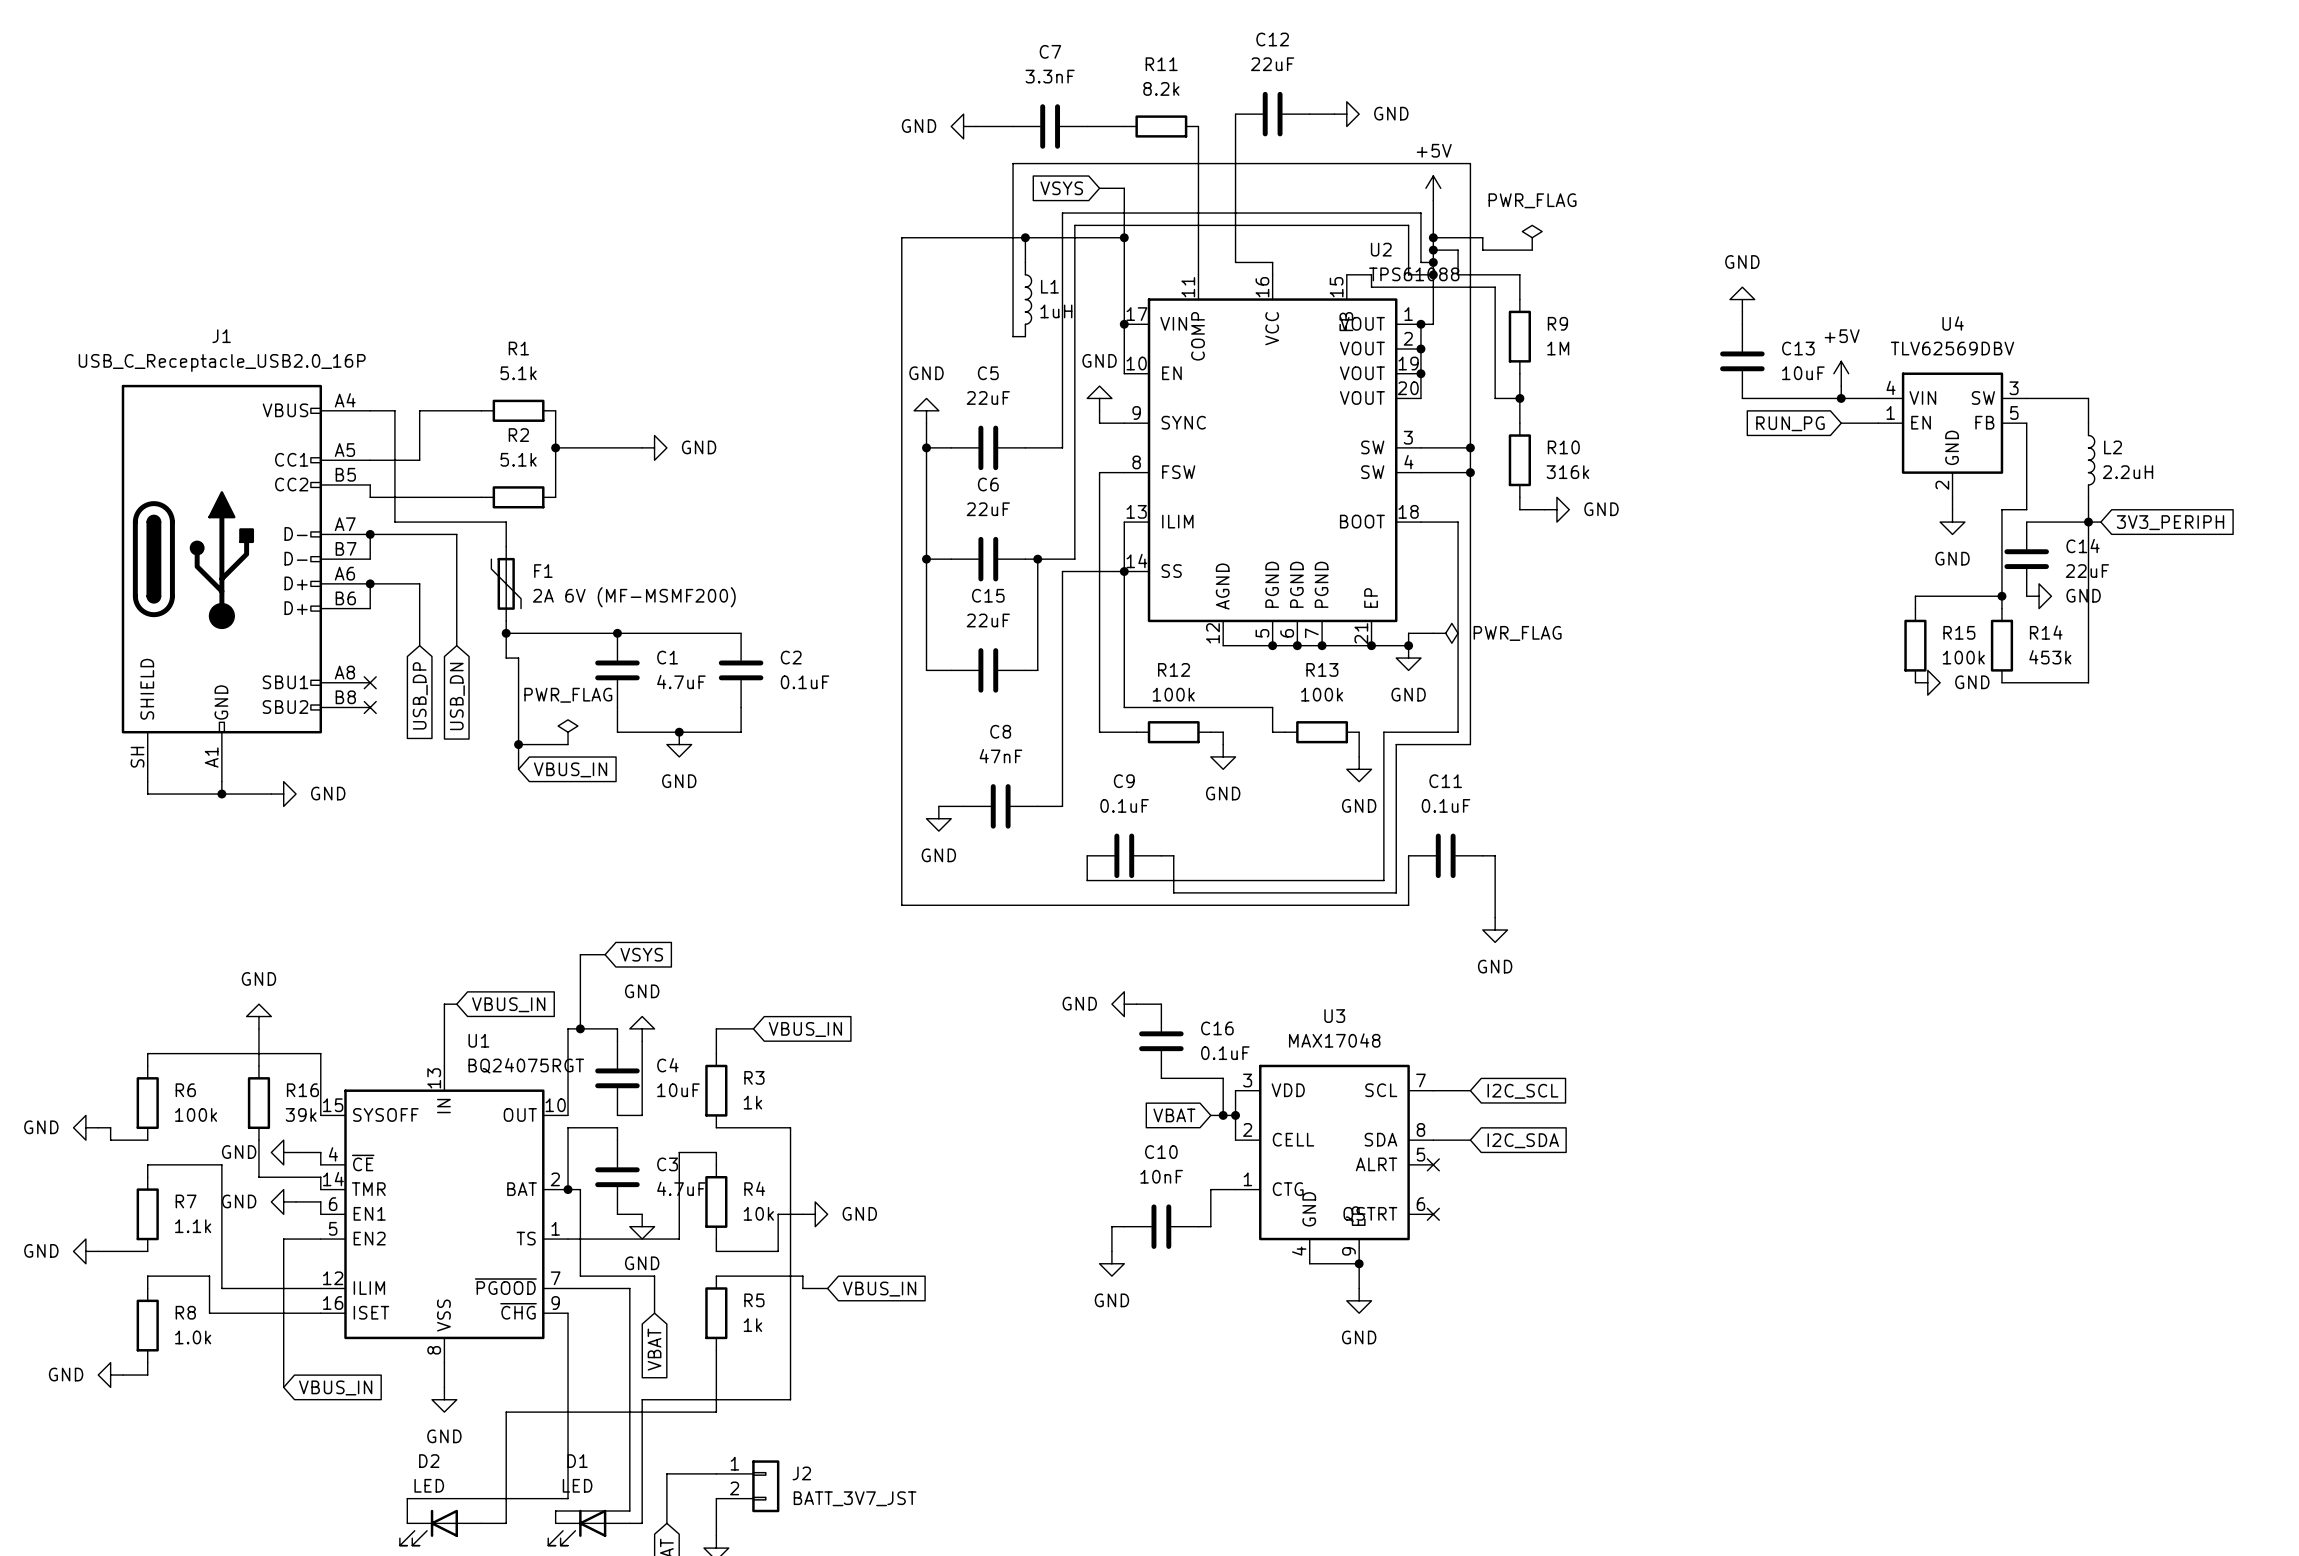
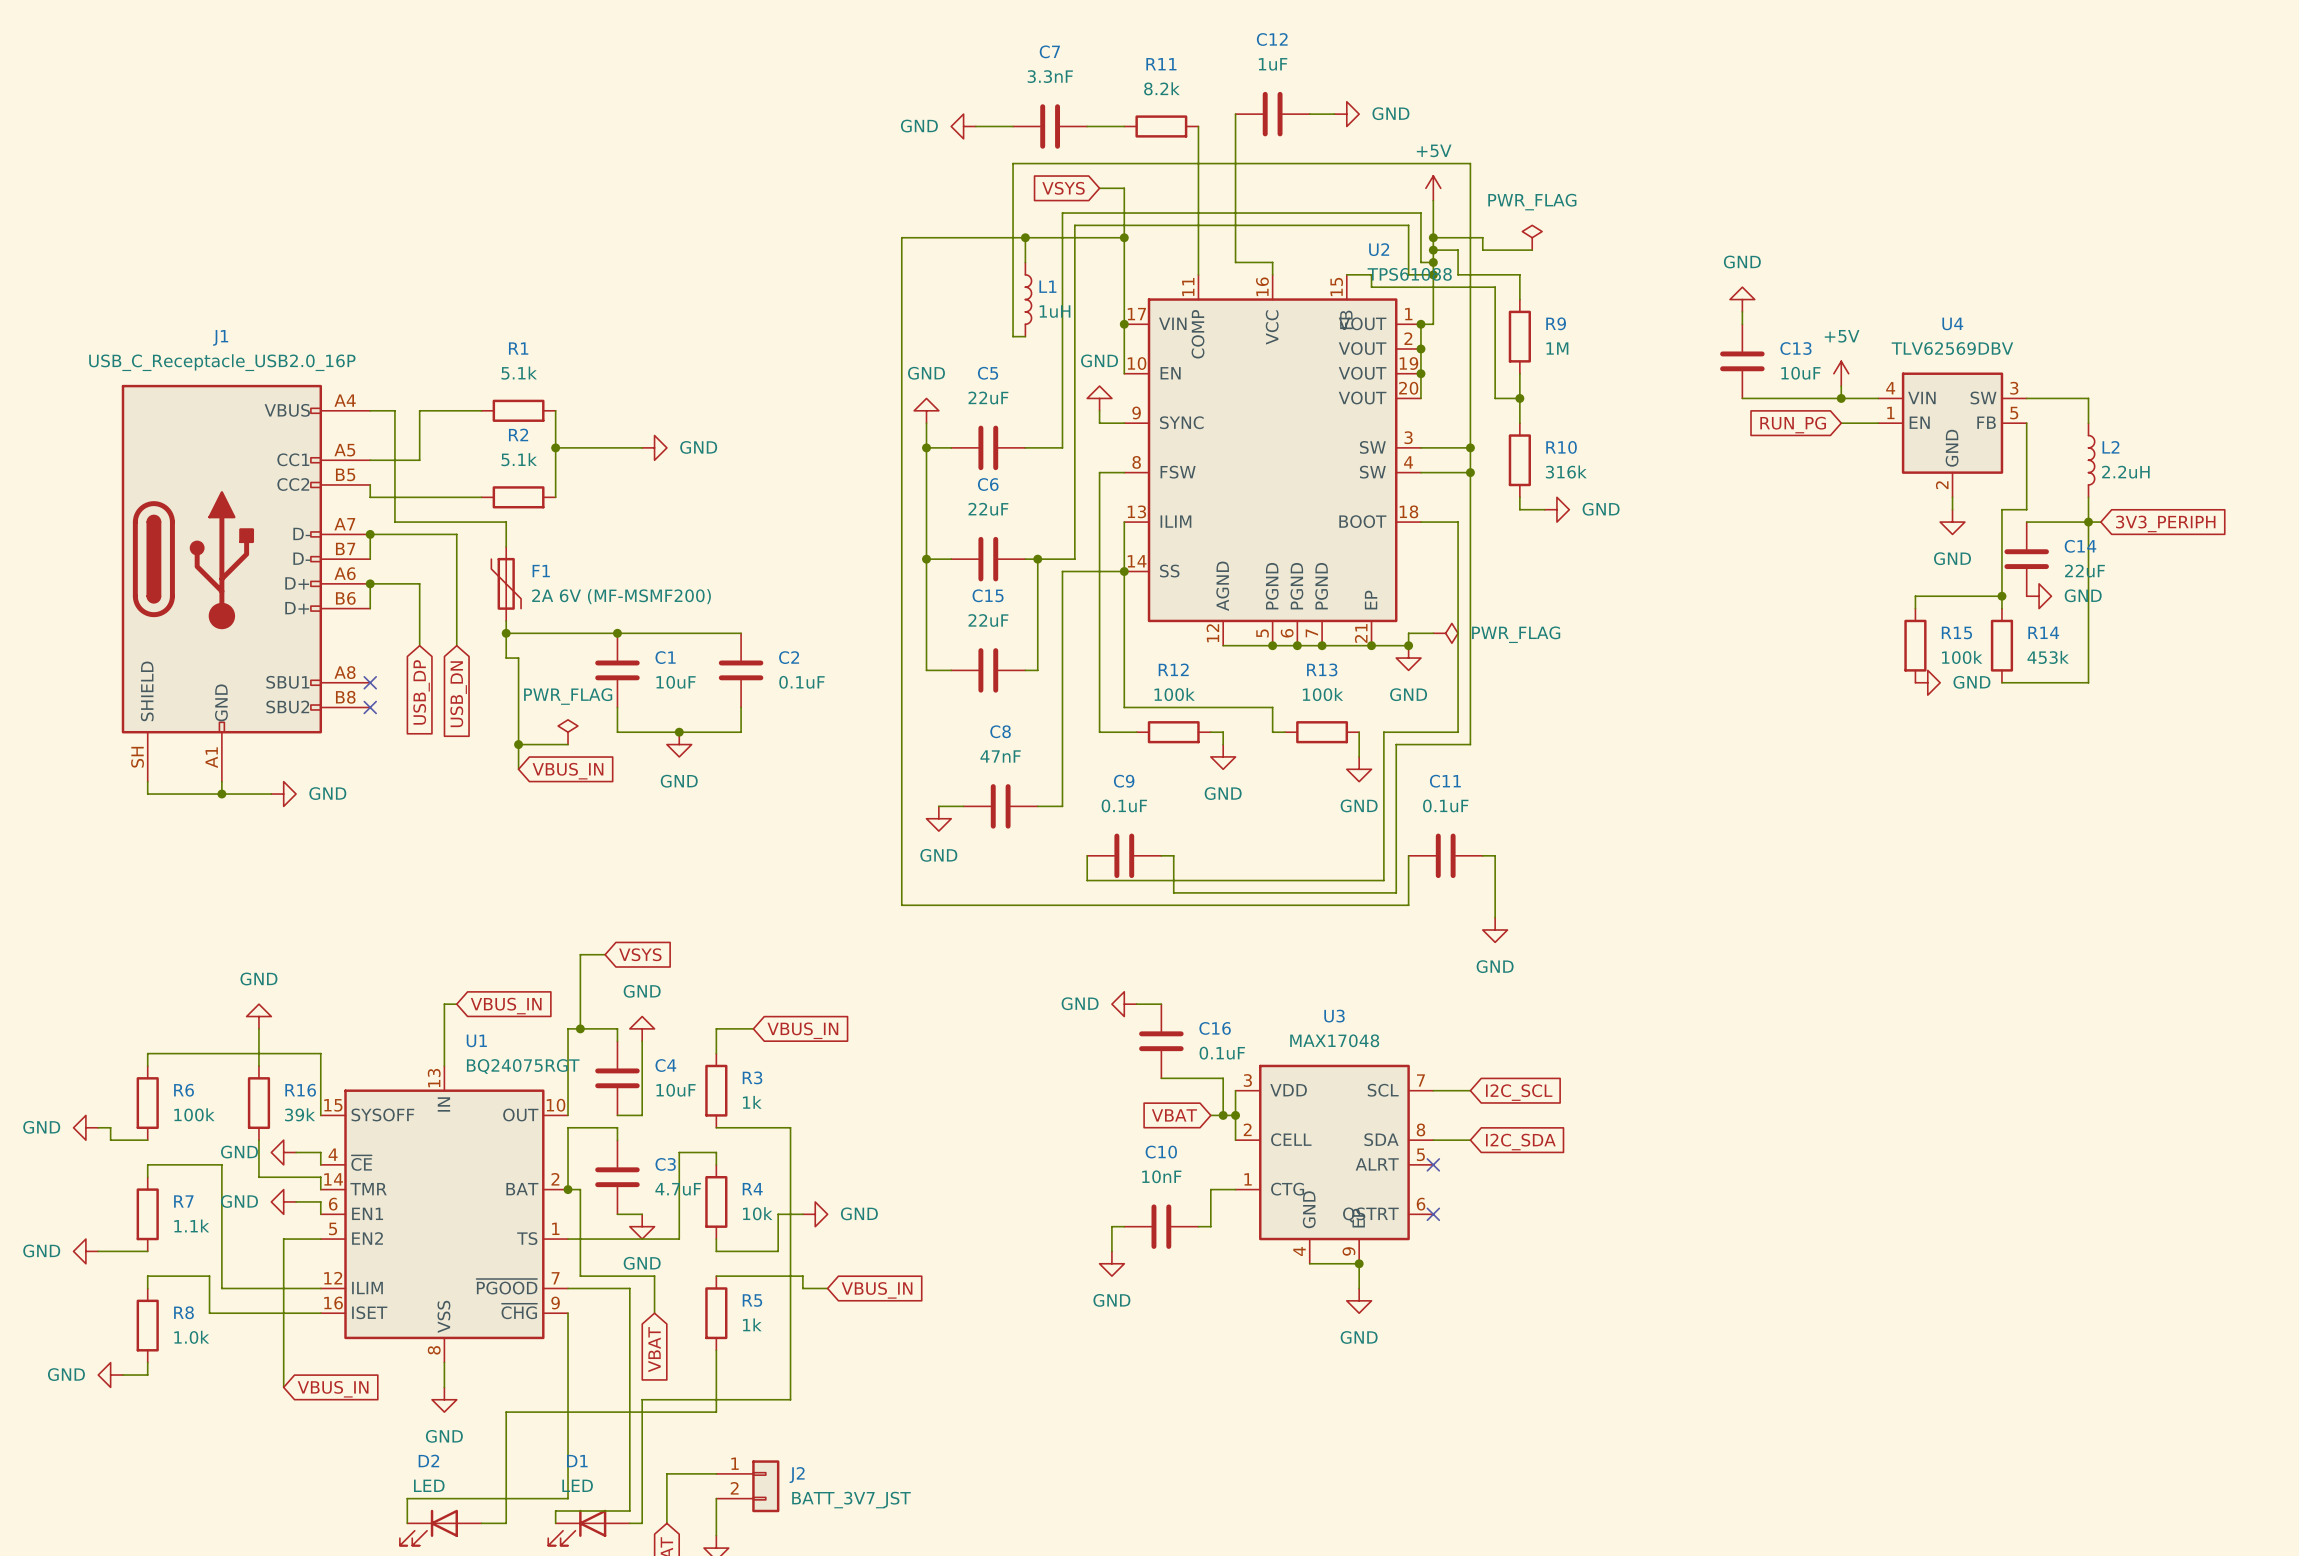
C12 value: 22uF (1272, 64) -> 1uF (1273, 64)
C1 value: 4.7uF (681, 682) -> 10uF (676, 682)

